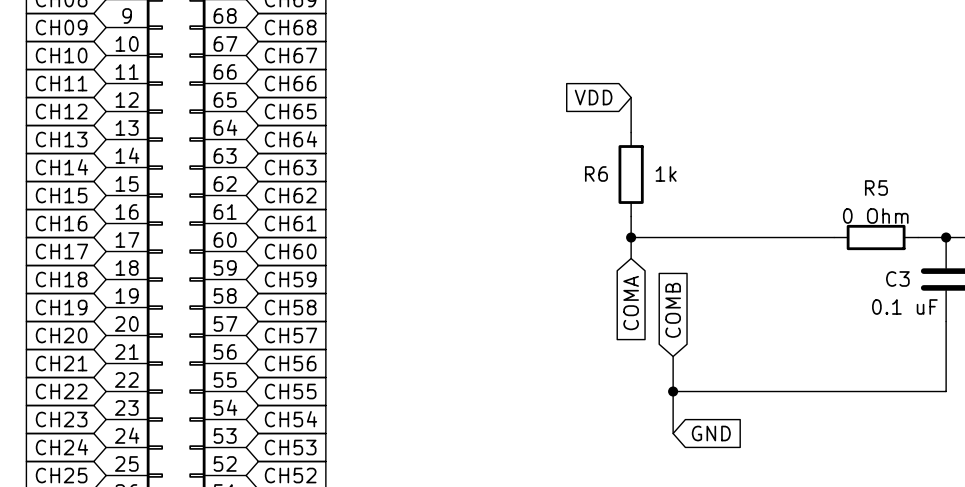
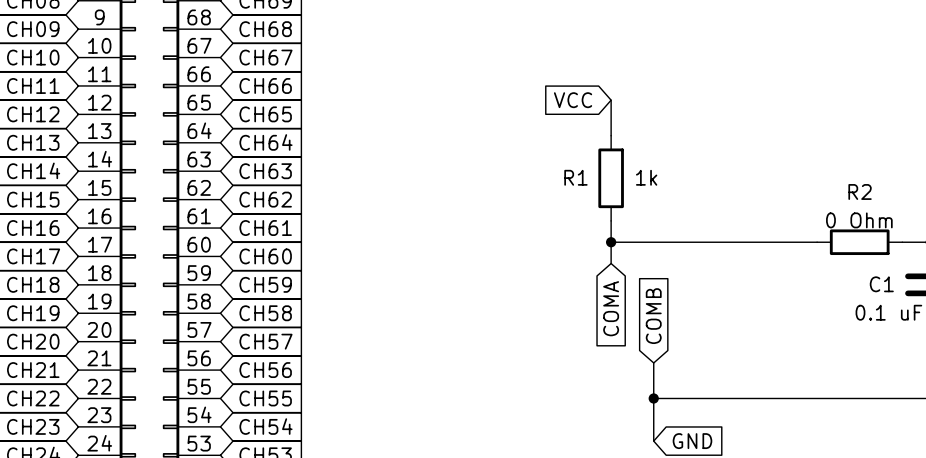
global label: VDD (593, 97) -> VCC (573, 100)
R6 name: R6 (596, 174) -> R1 (575, 177)
R5 name: R5 (876, 188) -> R2 (860, 191)
C3 name: C3 (897, 278) -> C1 (881, 284)

